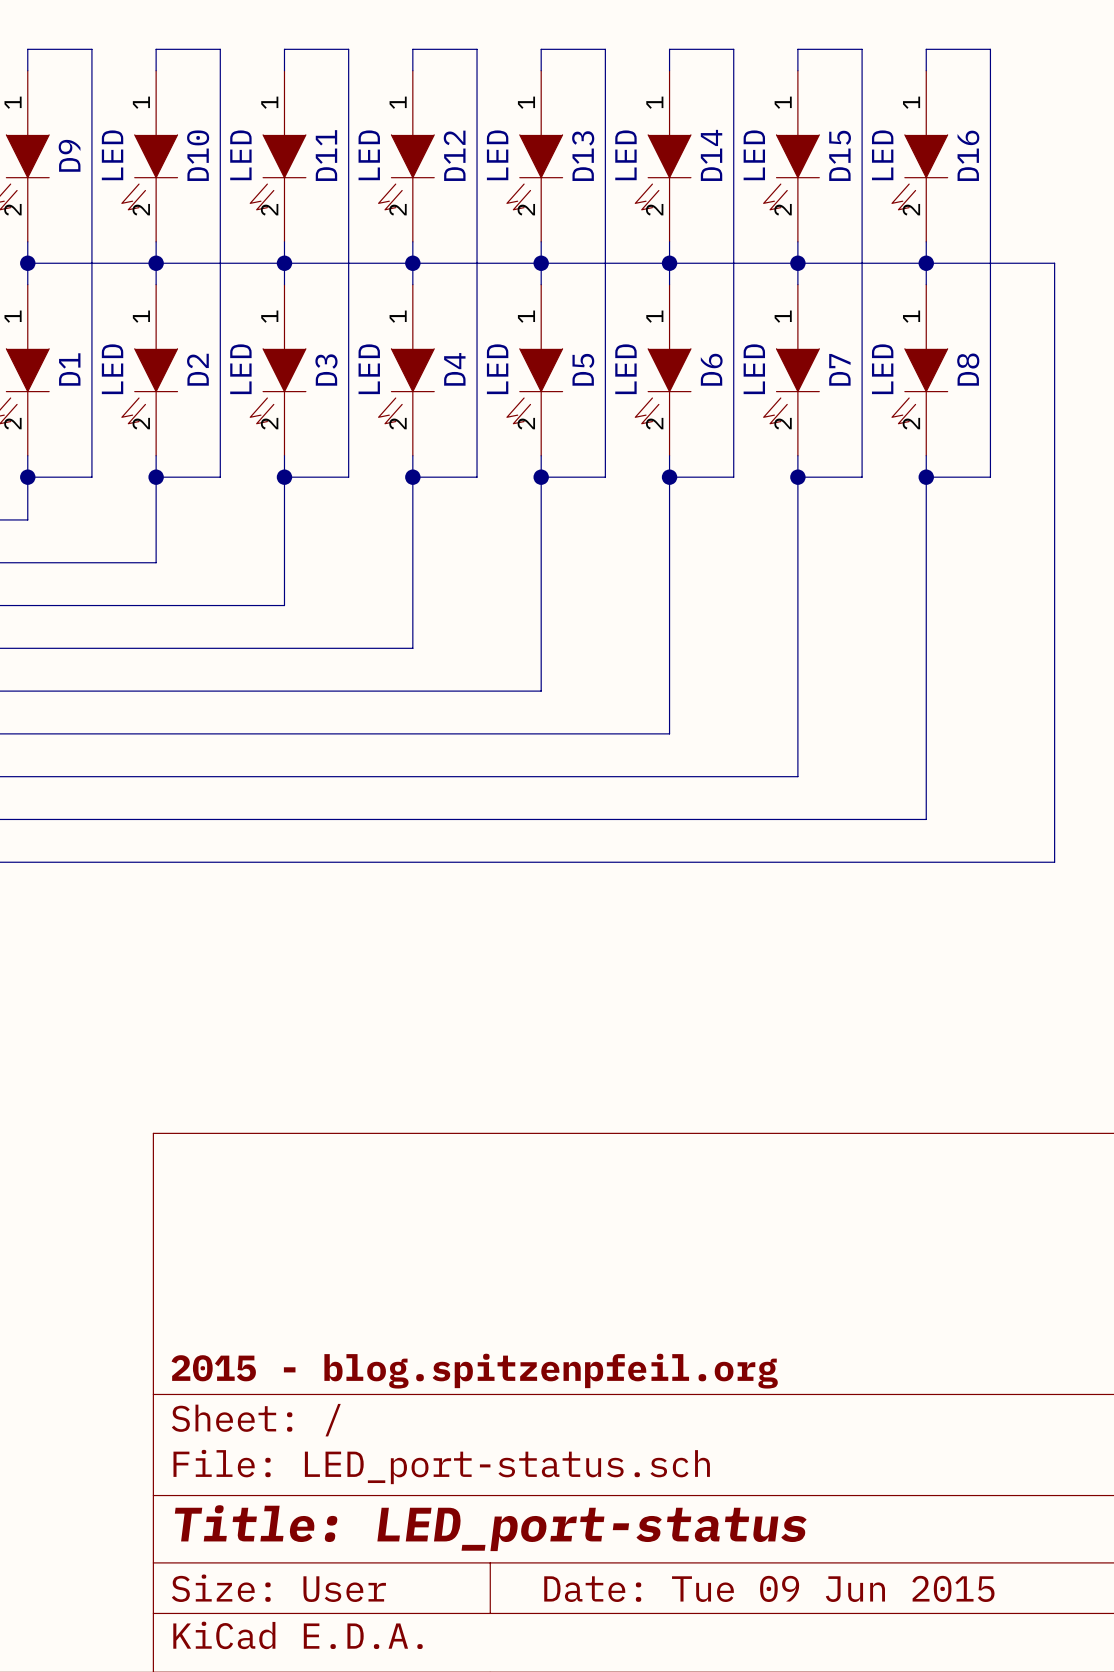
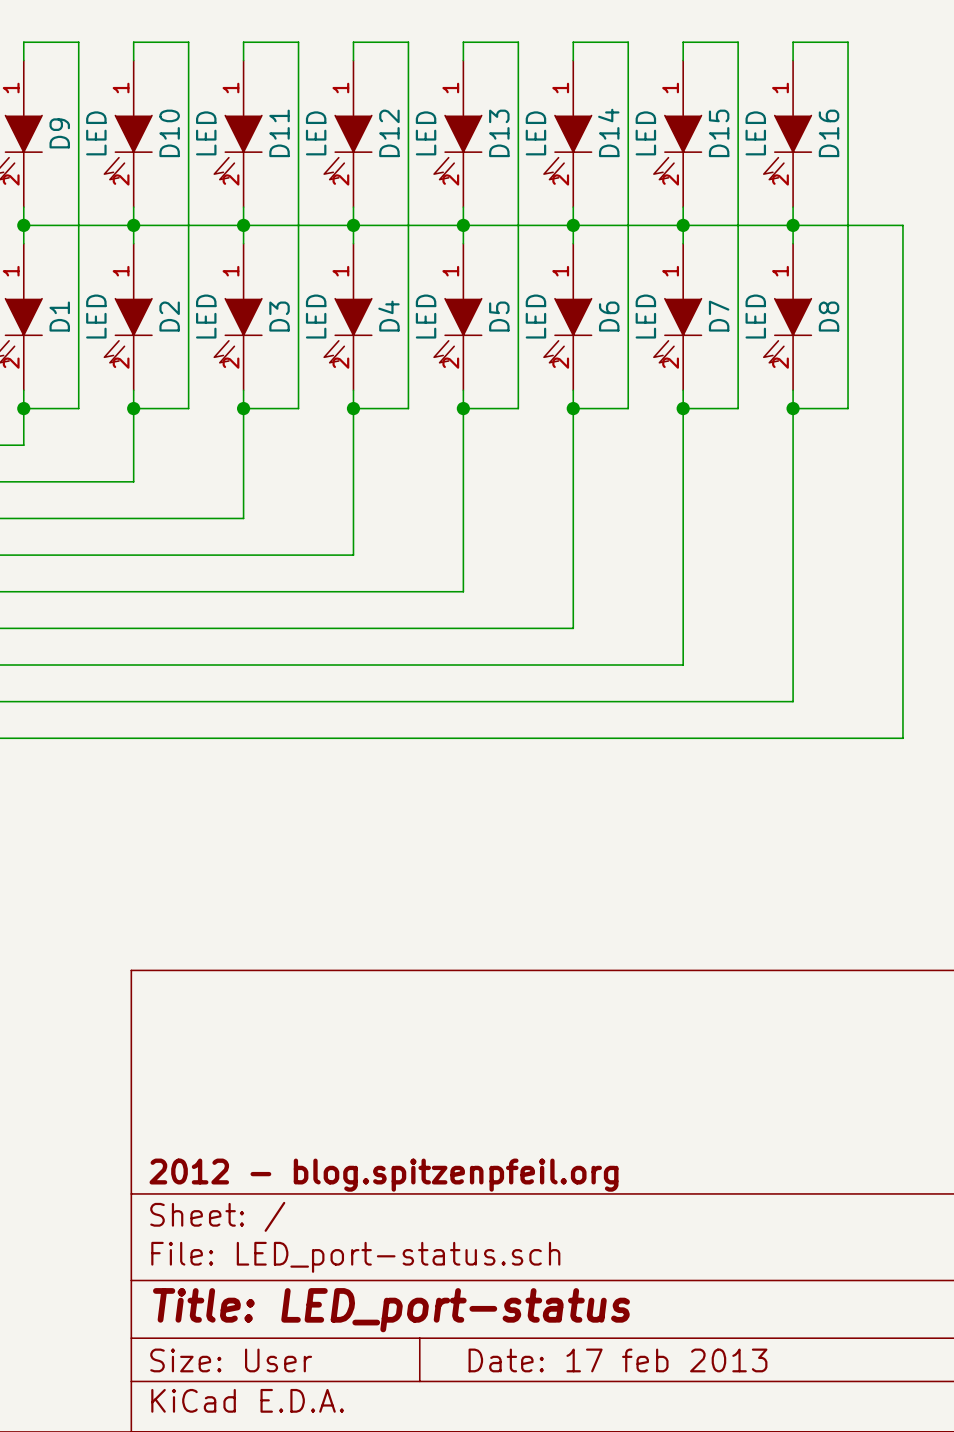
title block: 2015 - blog.spitzenpfeil.org (474, 1371) -> 2012 - blog.spitzenpfeil.org (383, 1175)
title block: Date: Tue 09 Jun 2015 (769, 1588) -> Date: 17 feb 2013 (617, 1360)

